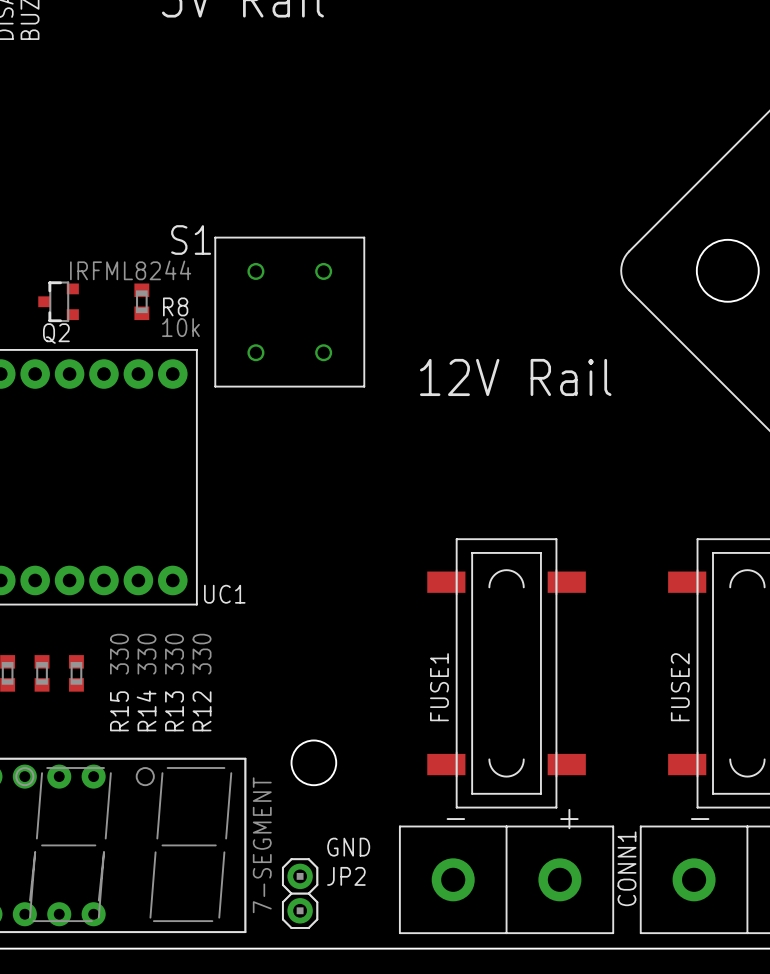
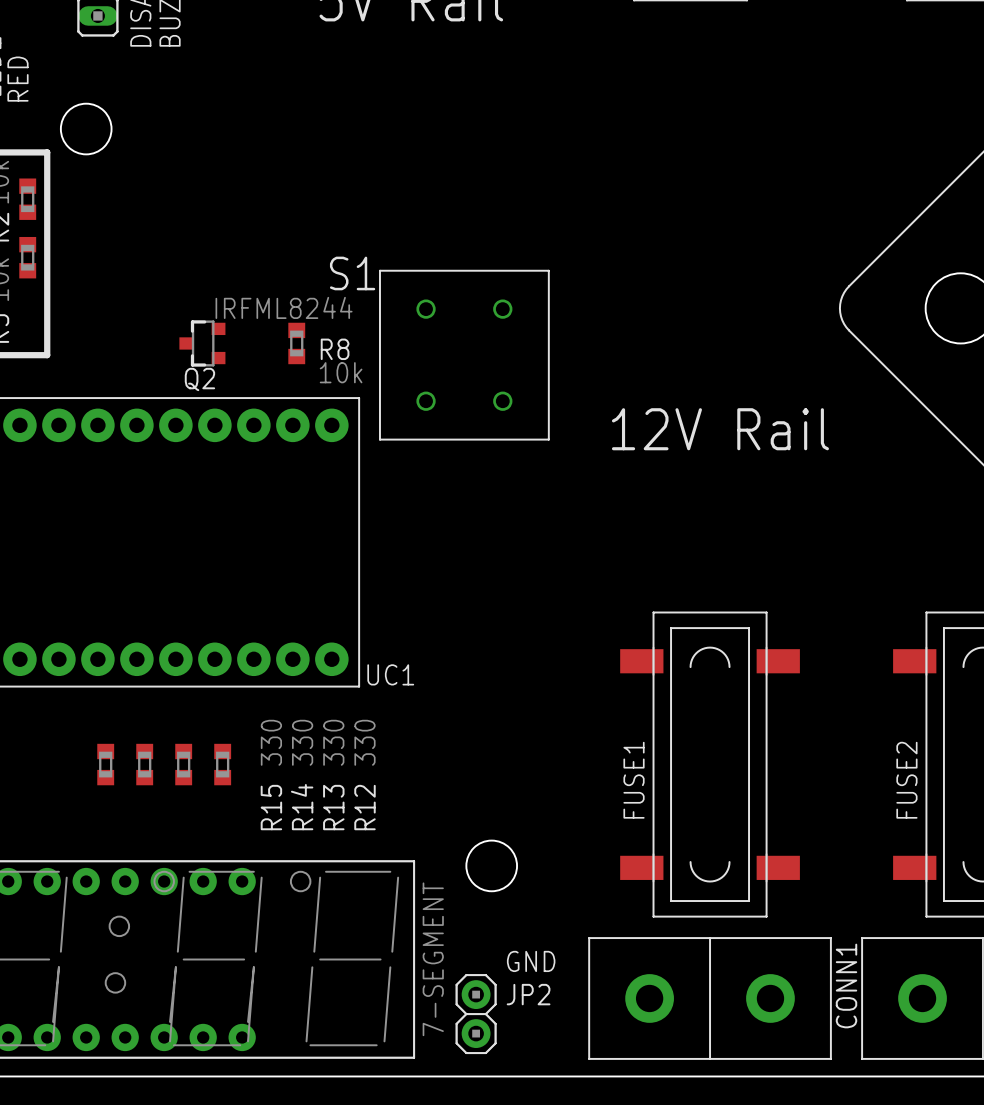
text: - (455, 819) -> none
text: + (569, 819) -> none
text: - (700, 819) -> none

